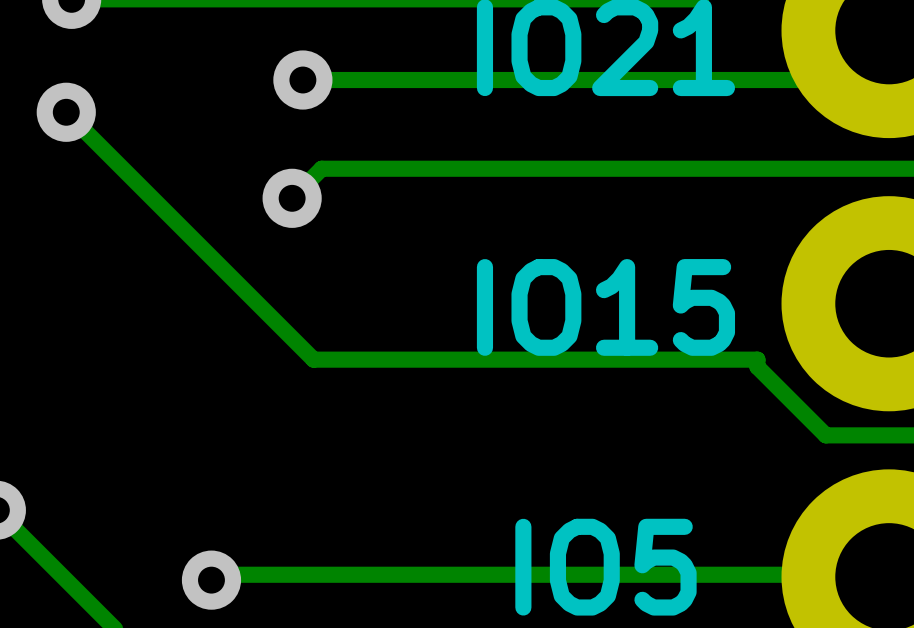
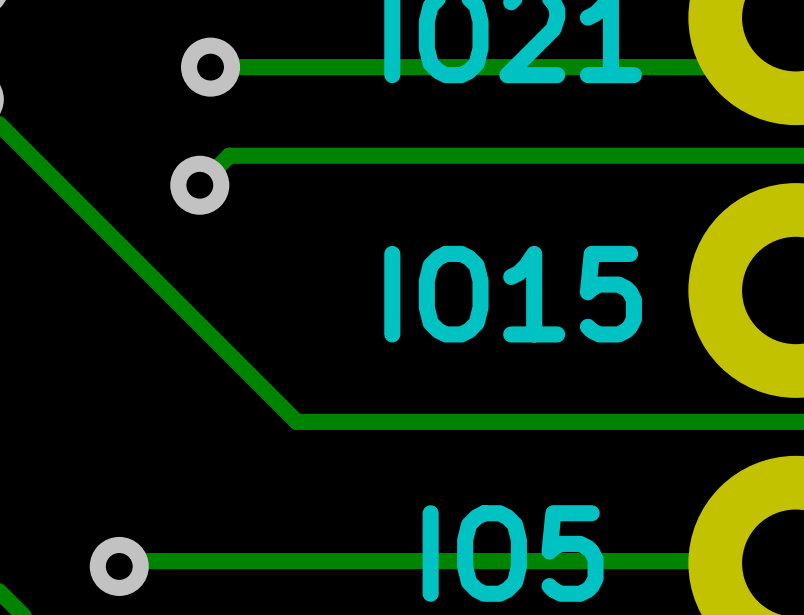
track: (313, 359) (757, 359) (757, 366) (825, 435) -> (221, 346) (296, 421) (732, 421)

